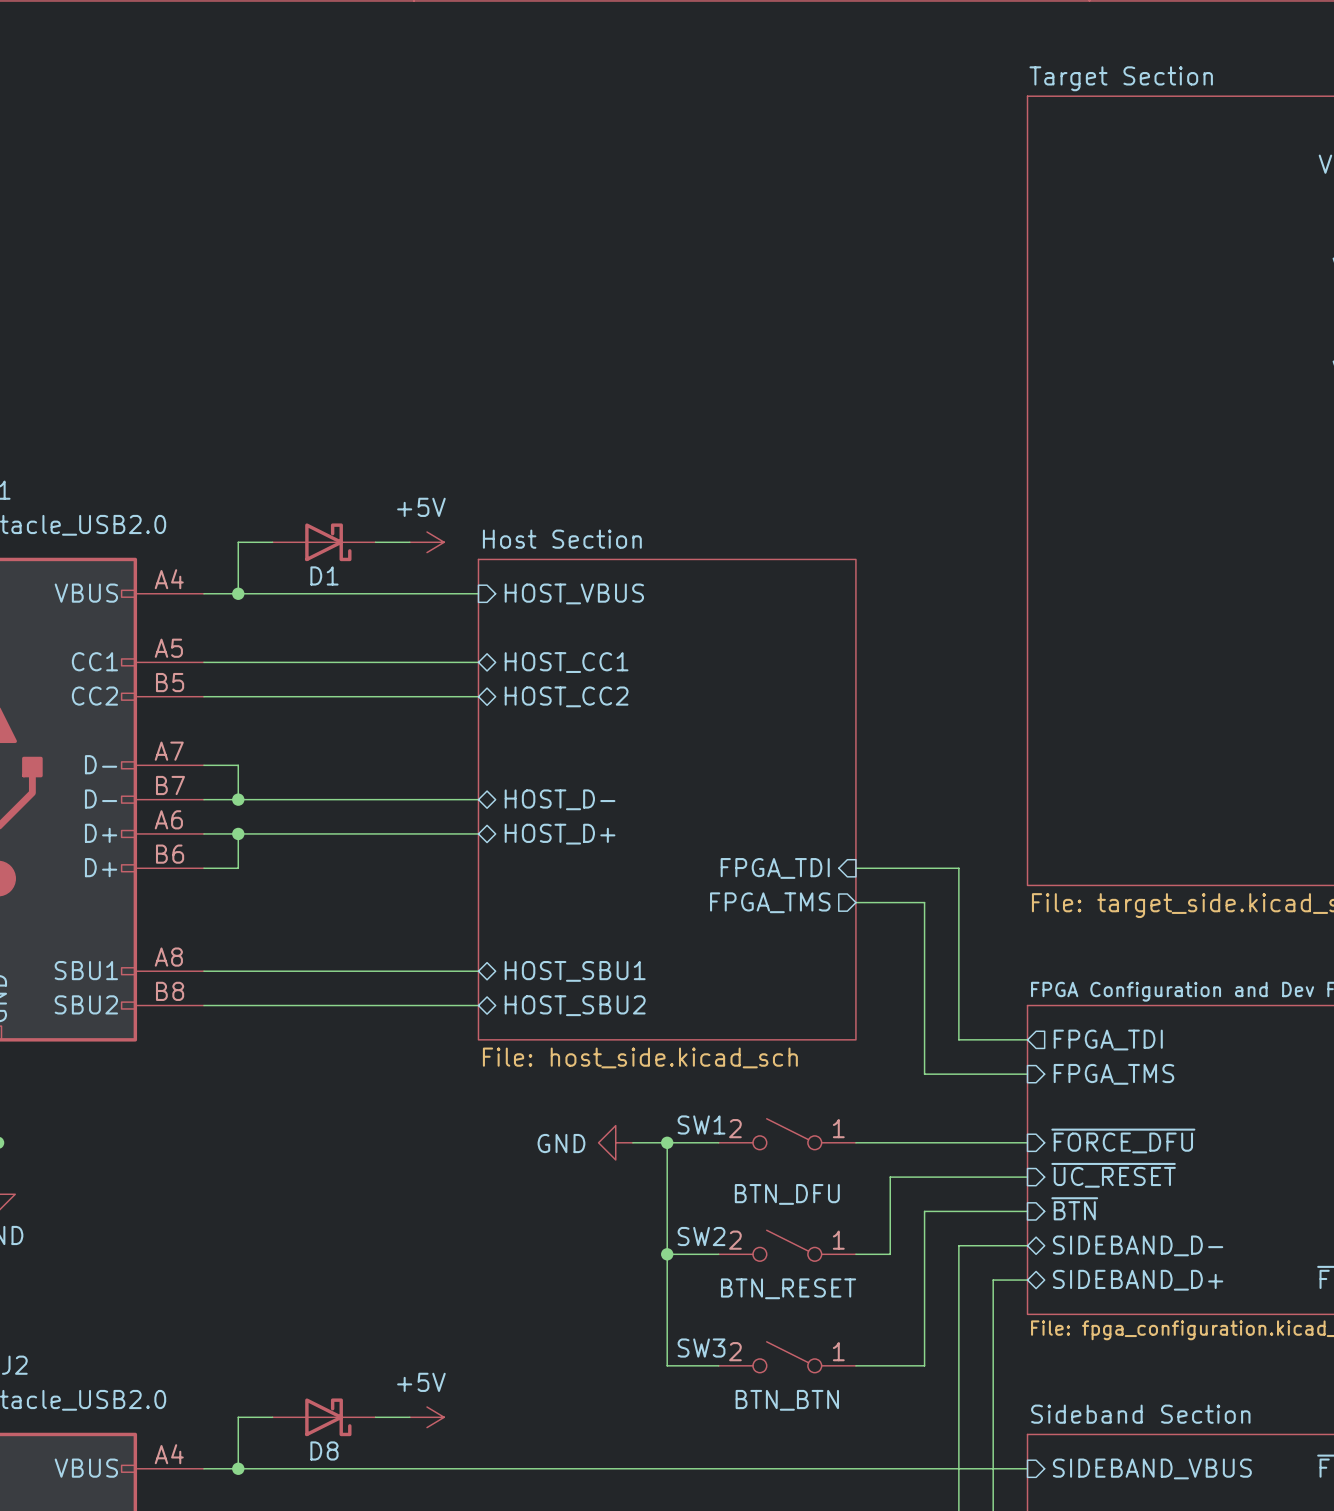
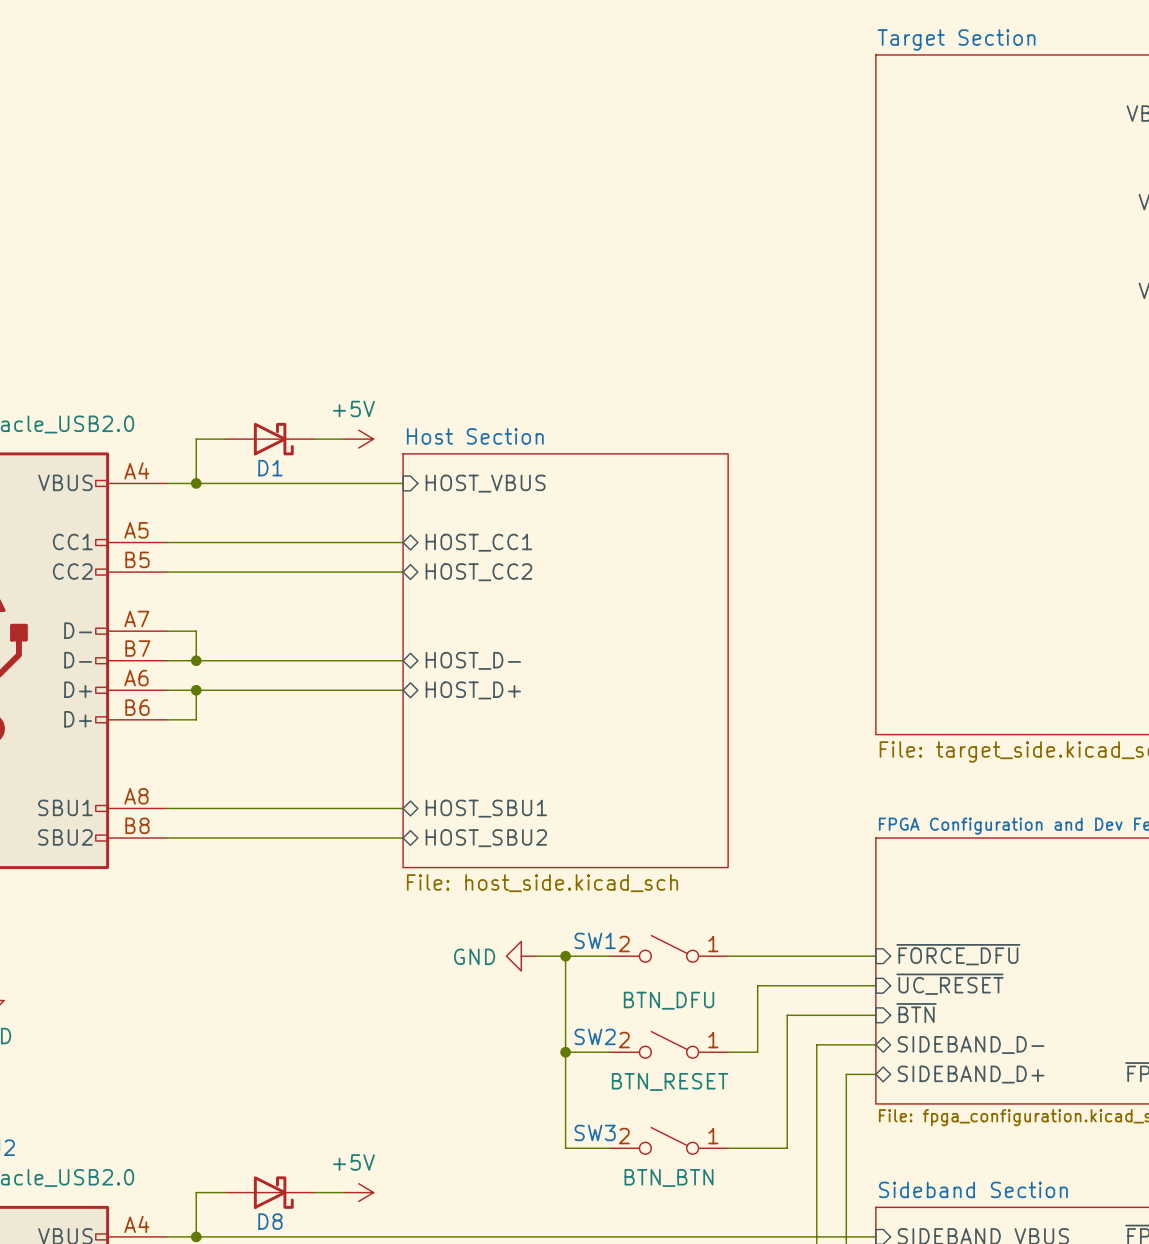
sheet pin: FPGA_TDI (775, 868) -> none
wire: (855, 868) (958, 868) (958, 1039) (1027, 1039) -> none
sheet pin: FPGA_TMS (770, 902) -> none
wire: (855, 902) (924, 902) (924, 1074) (1027, 1074) -> none
sheet pin: FPGA_TDI (1108, 1040) -> none
sheet pin: FPGA_TMS (1113, 1074) -> none

